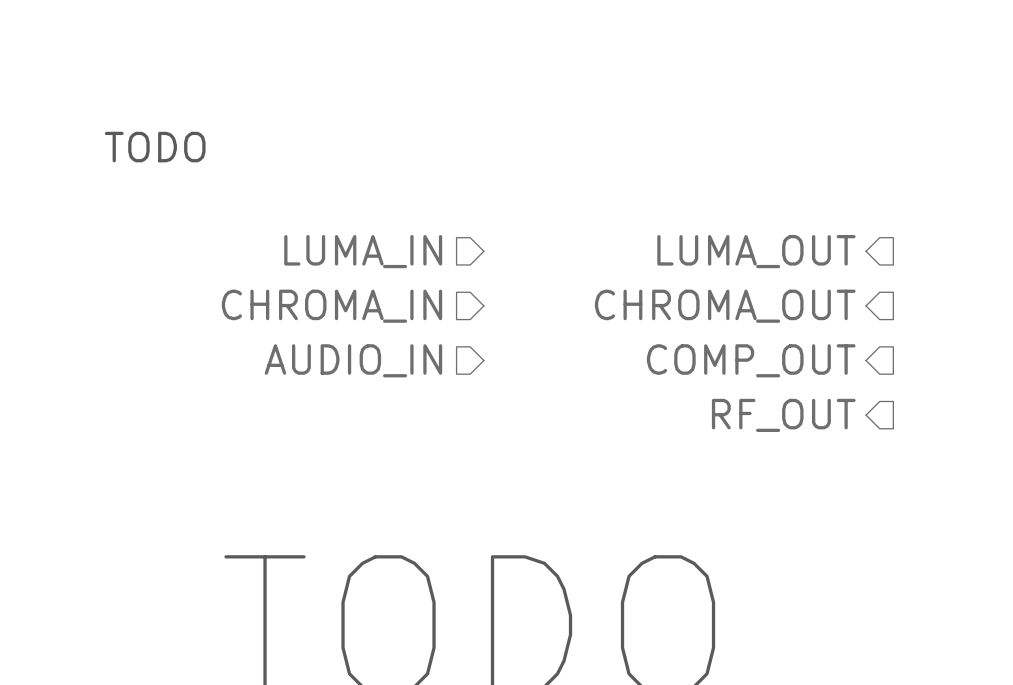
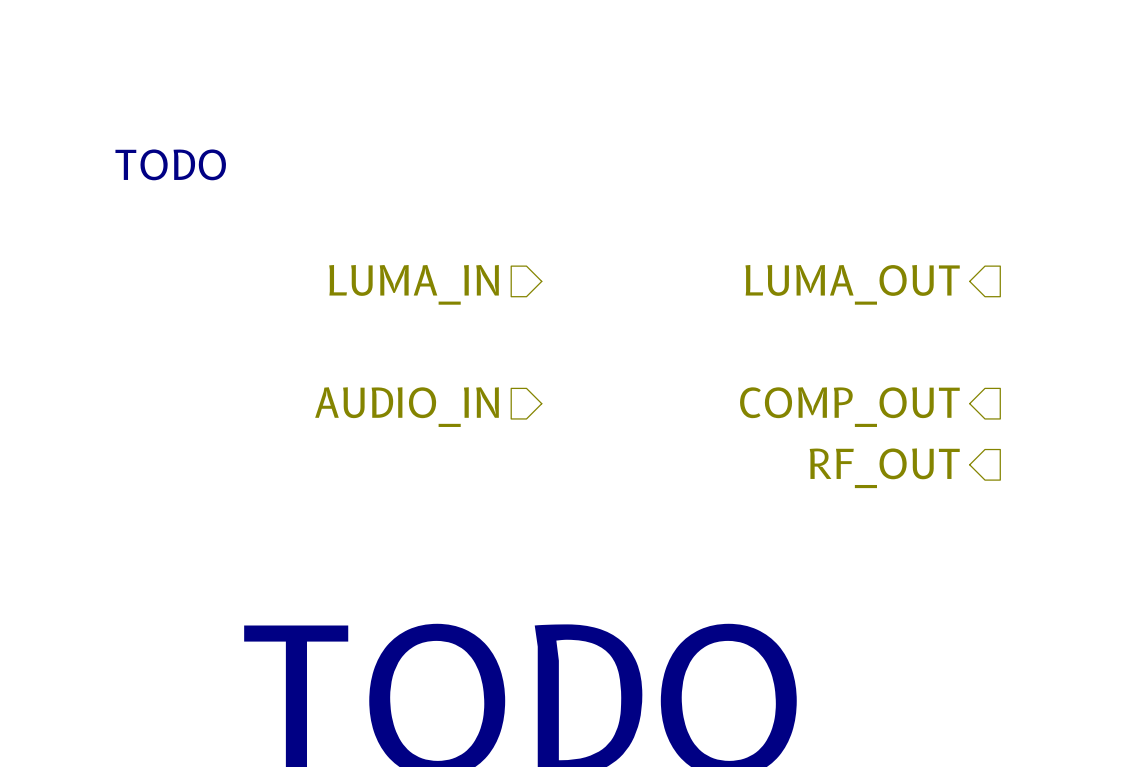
hierarchical label: CHROMA_IN (331, 306) -> none
hierarchical label: CHROMA_OUT (725, 306) -> none

